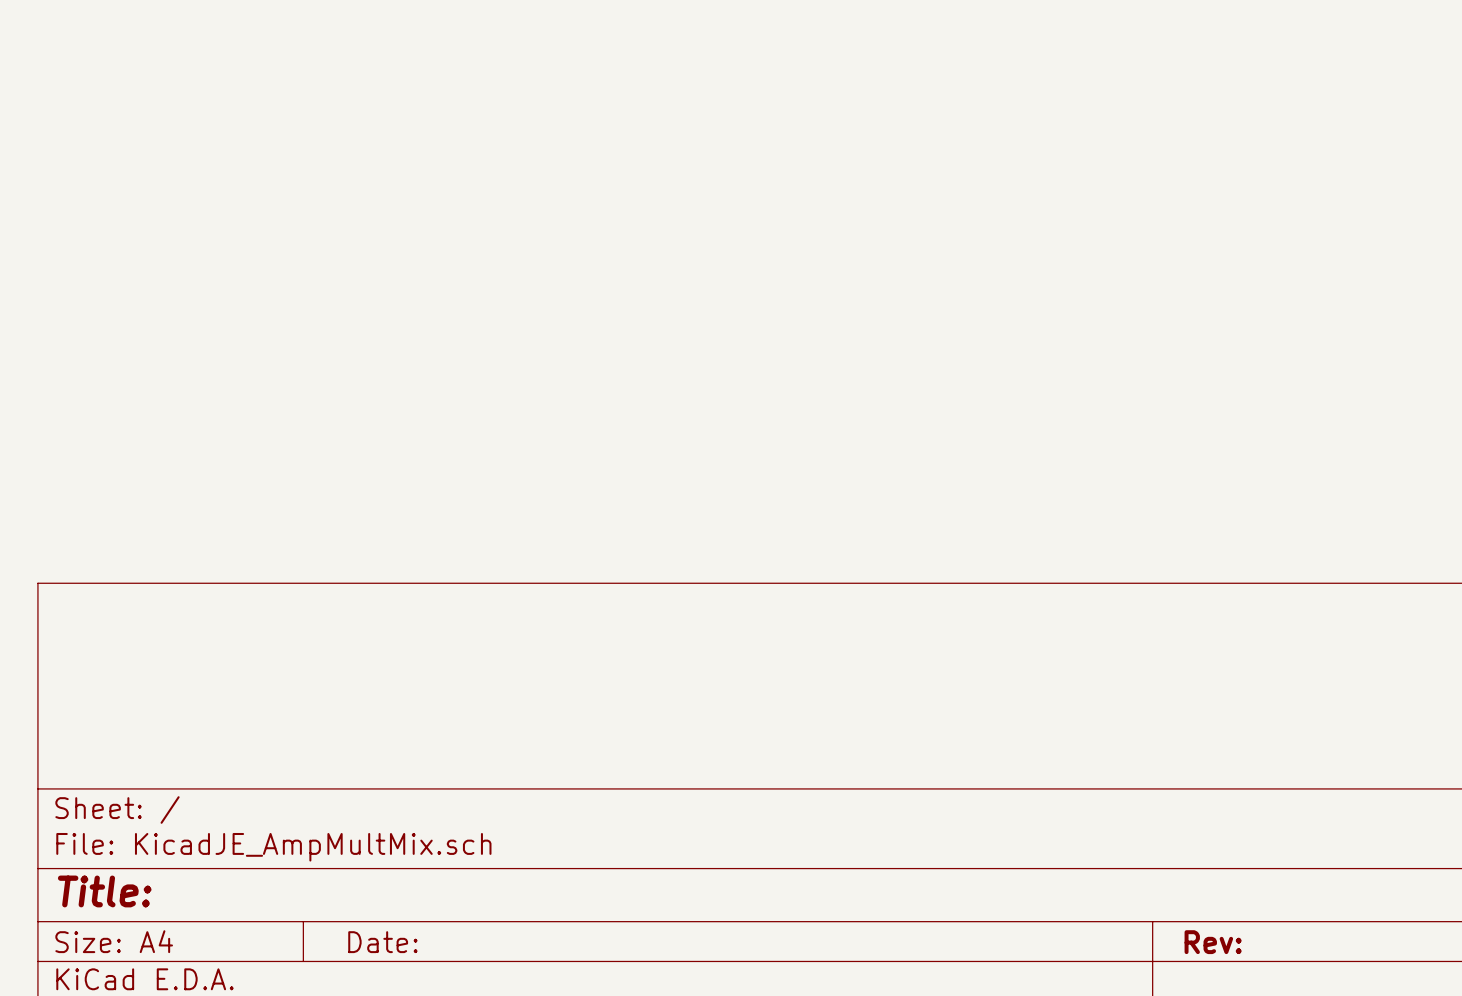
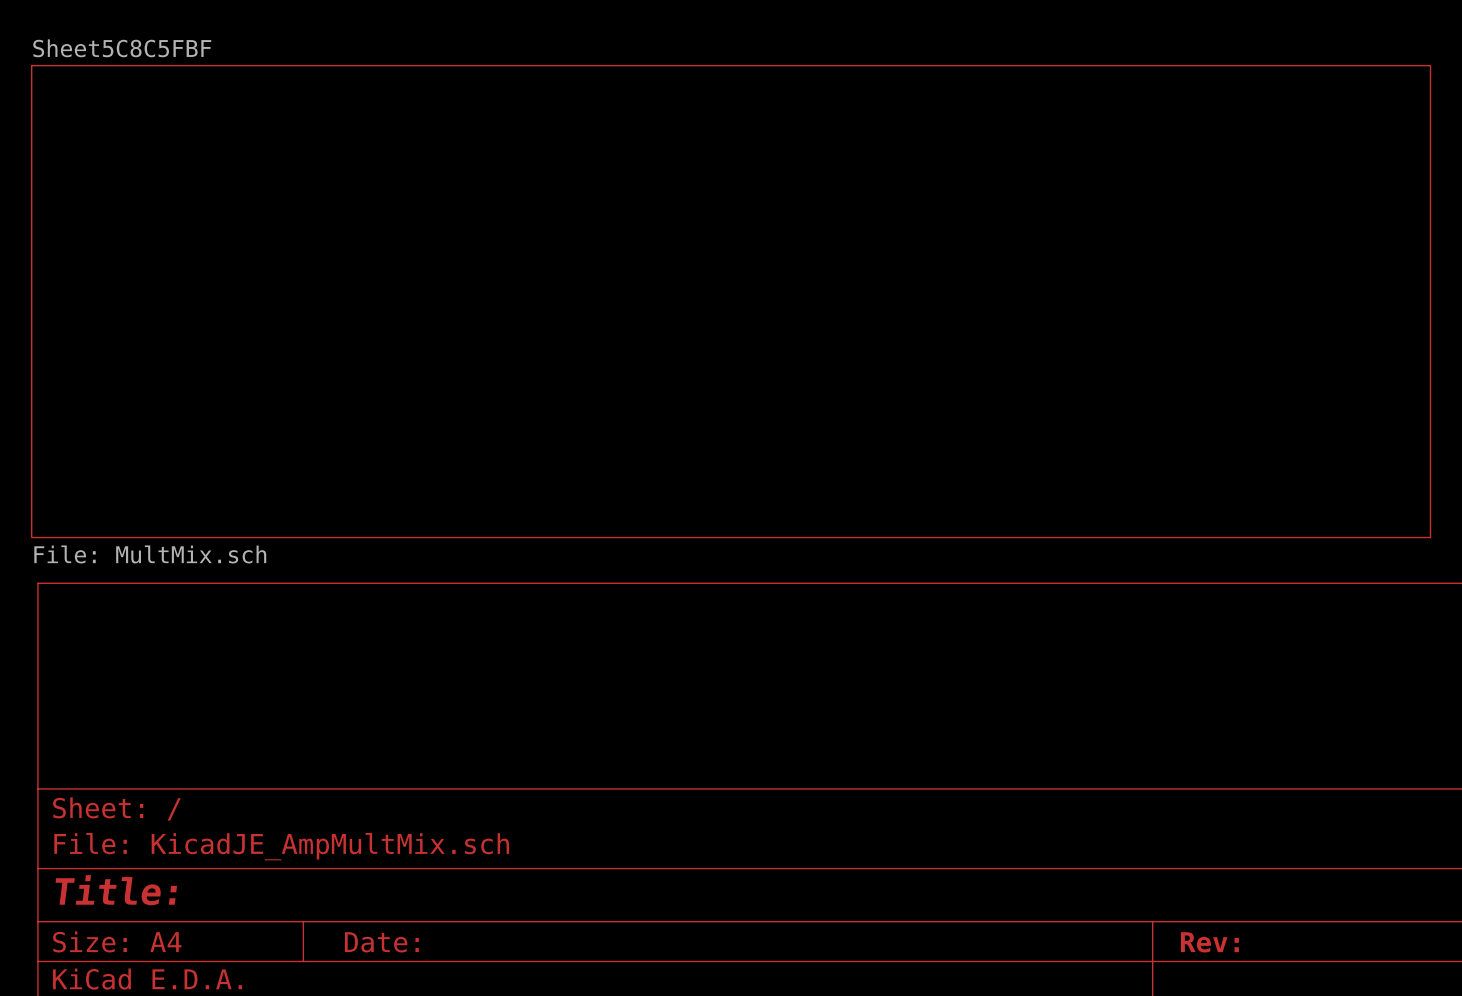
sheet Sheet5C8C5FBF: none -> File: MultMix.sch (731, 301)

